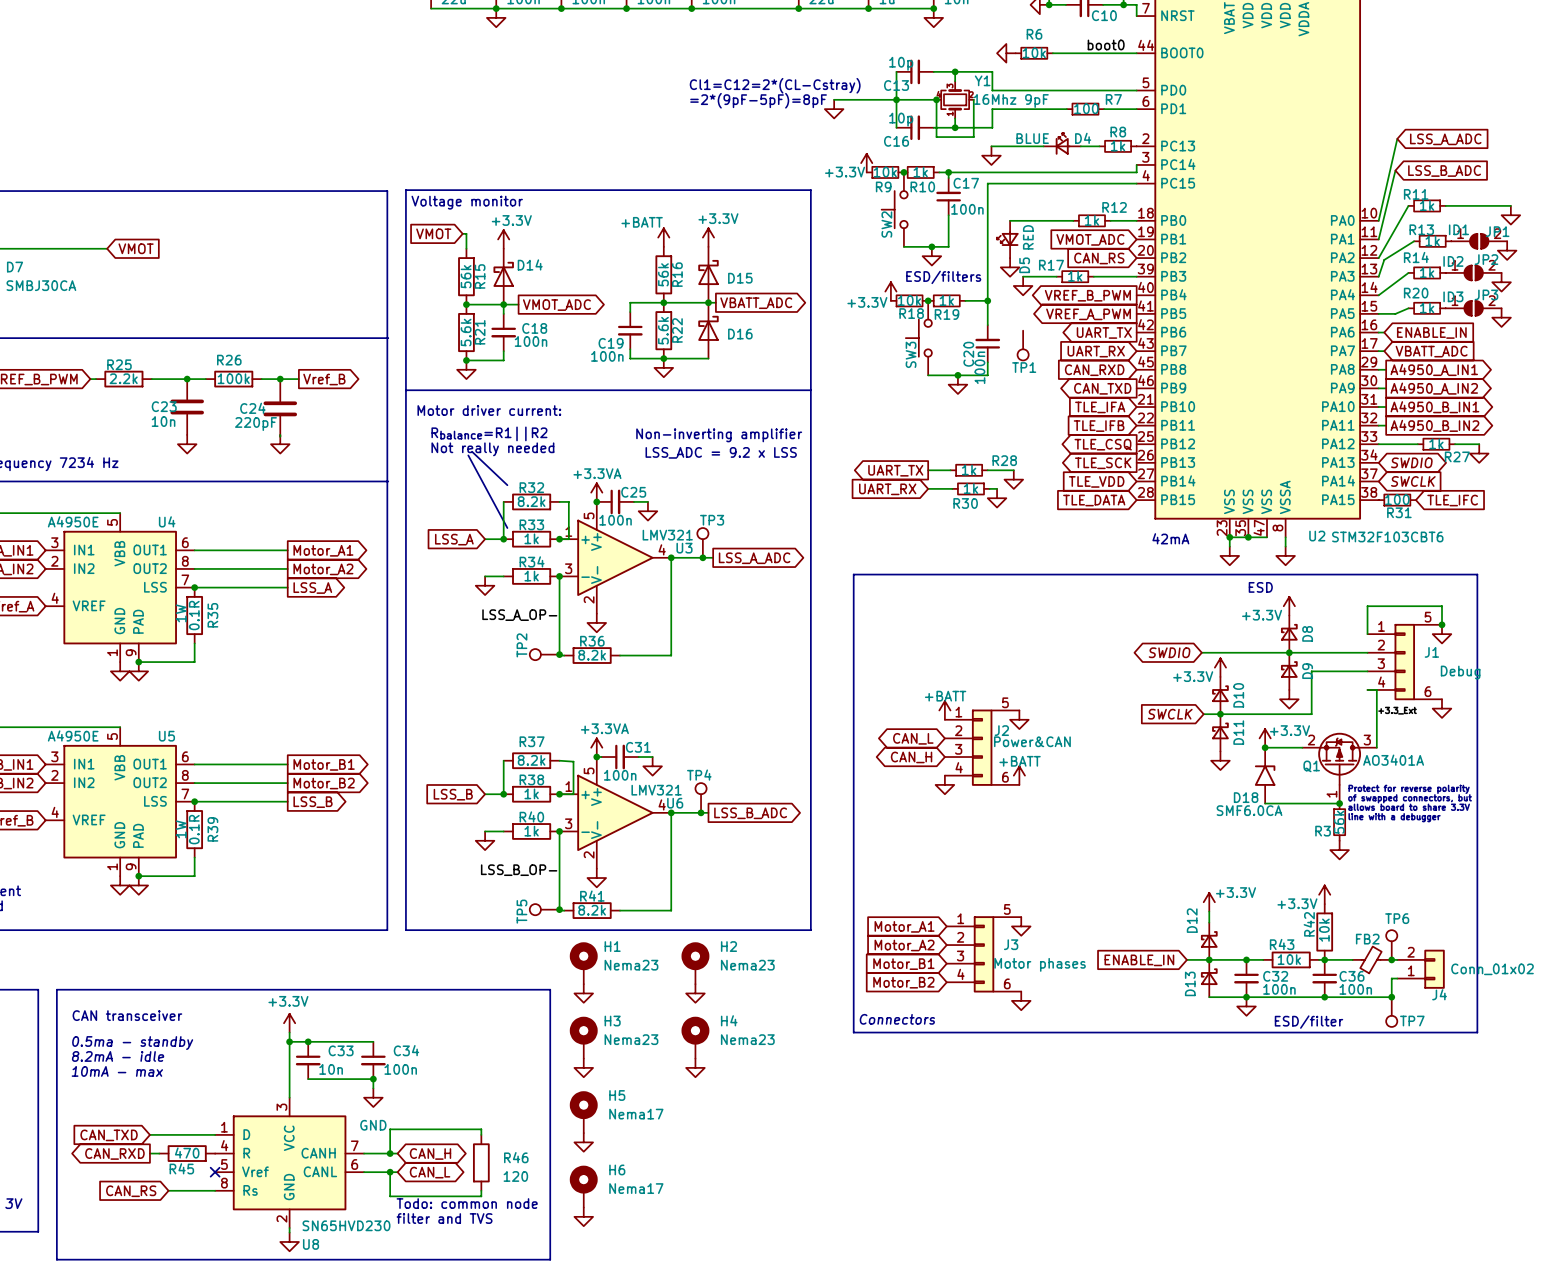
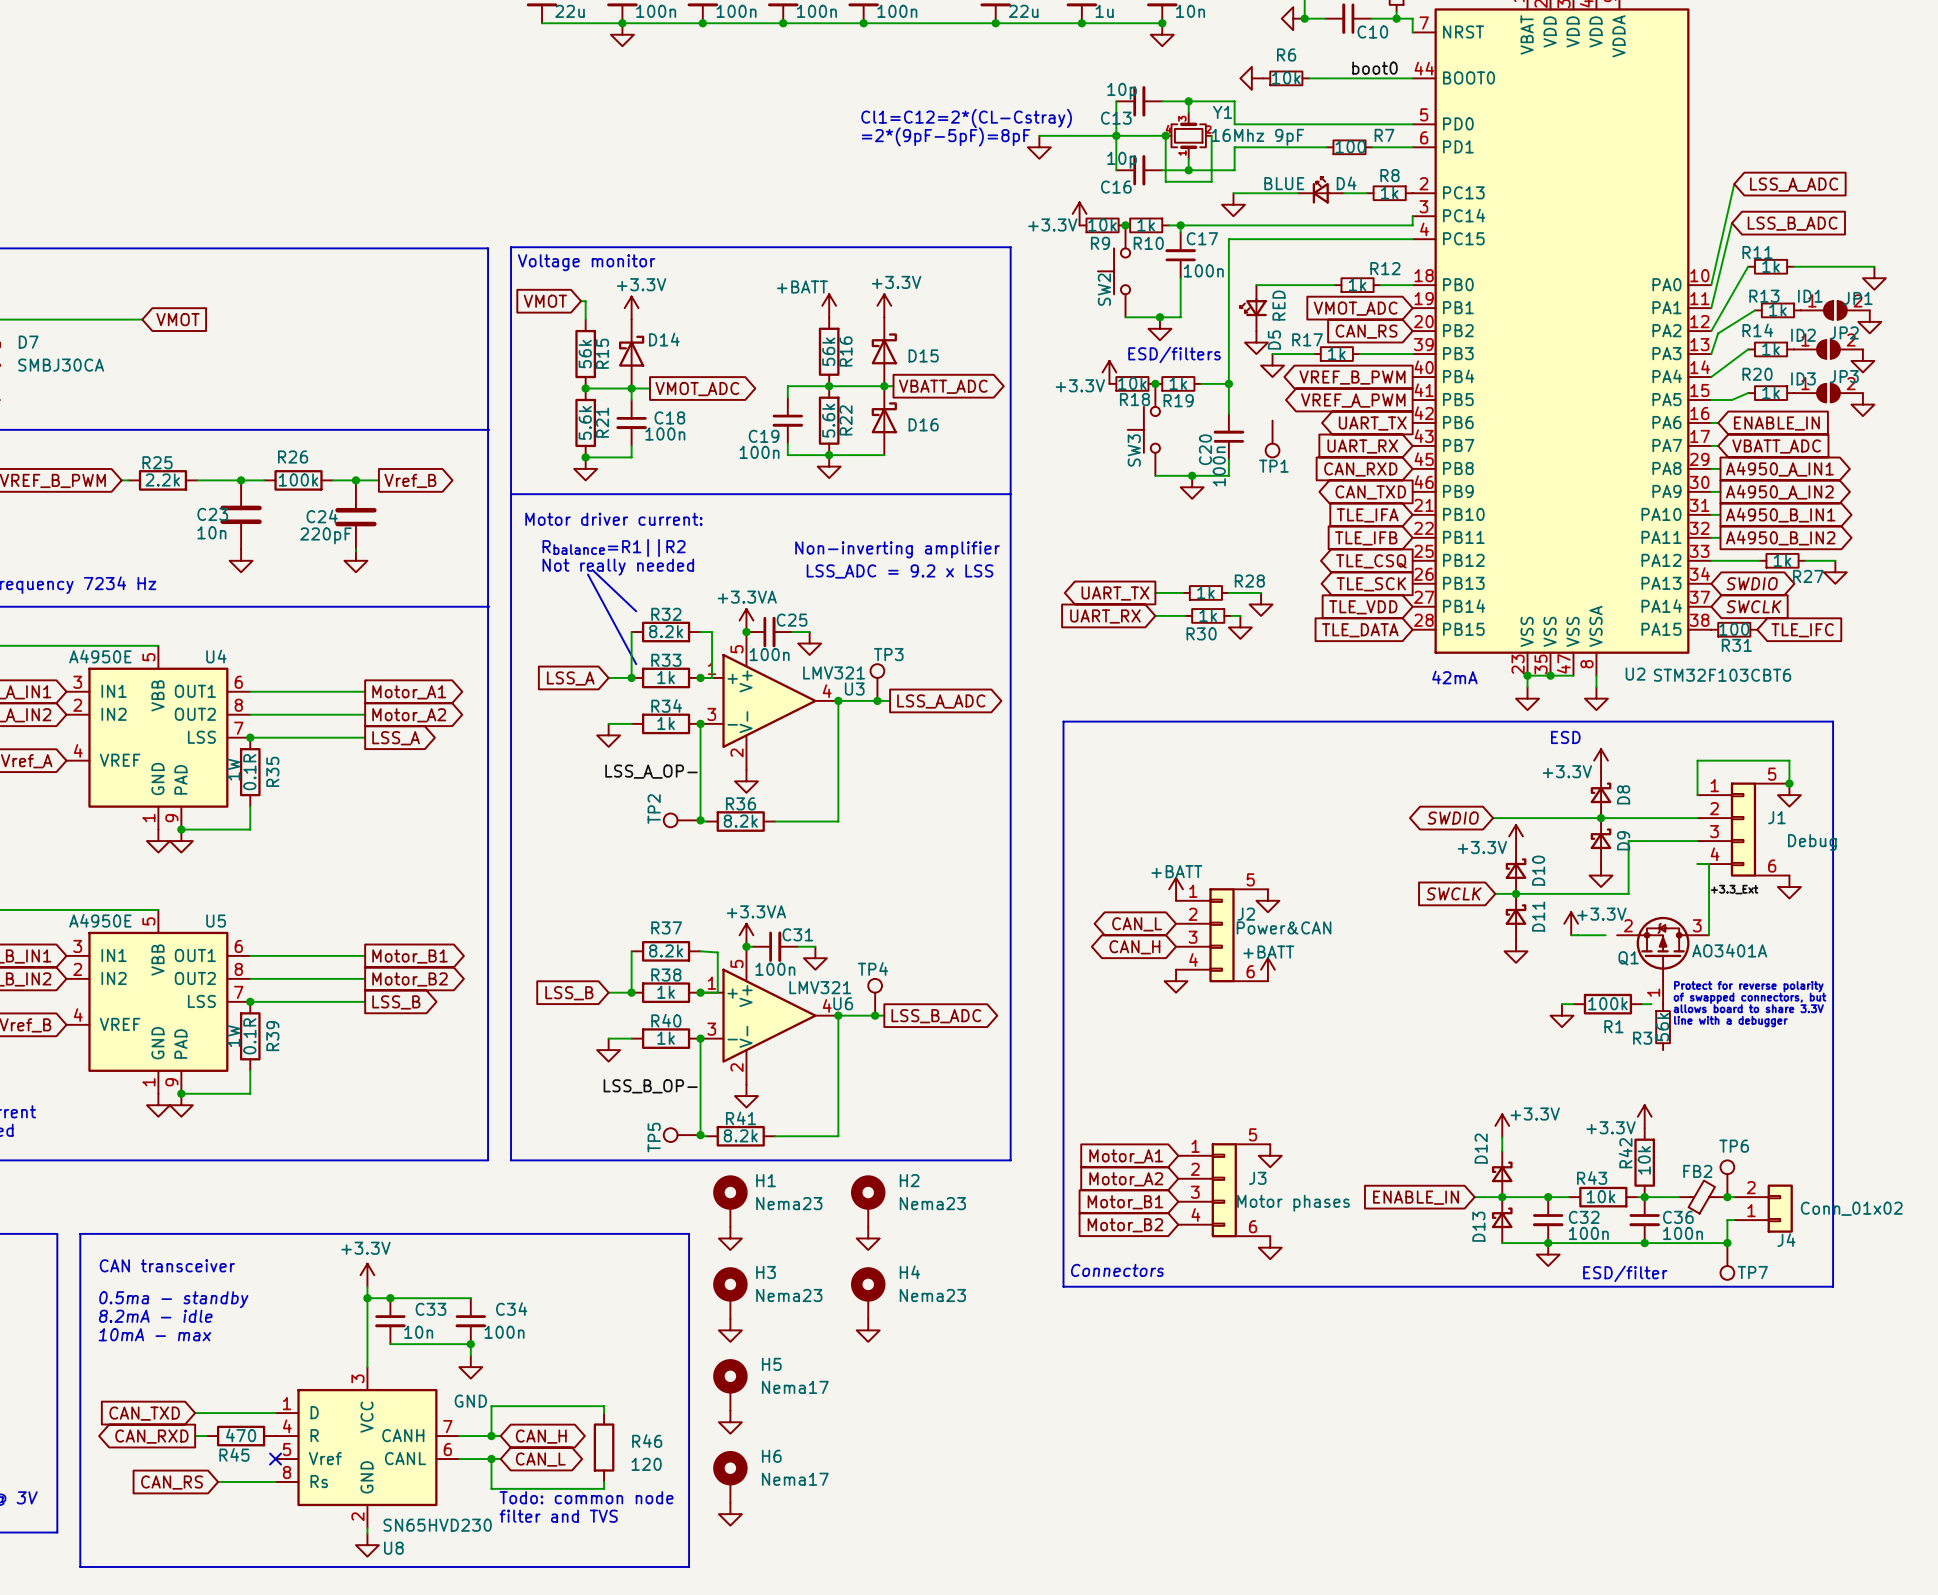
junction: (1265, 747) -> none
wire: (1293, 747) (1302, 747) -> none
D18: SMF6.0CA (1265, 775) -> none
wire: none -> (1561, 1004) (1571, 1004)
R1: none -> 100k (1607, 1004)
wire: (1330, 803) (1339, 803) -> none
junction: (1339, 803) -> none
power symbol position: (1339, 850) -> (1561, 1015)

